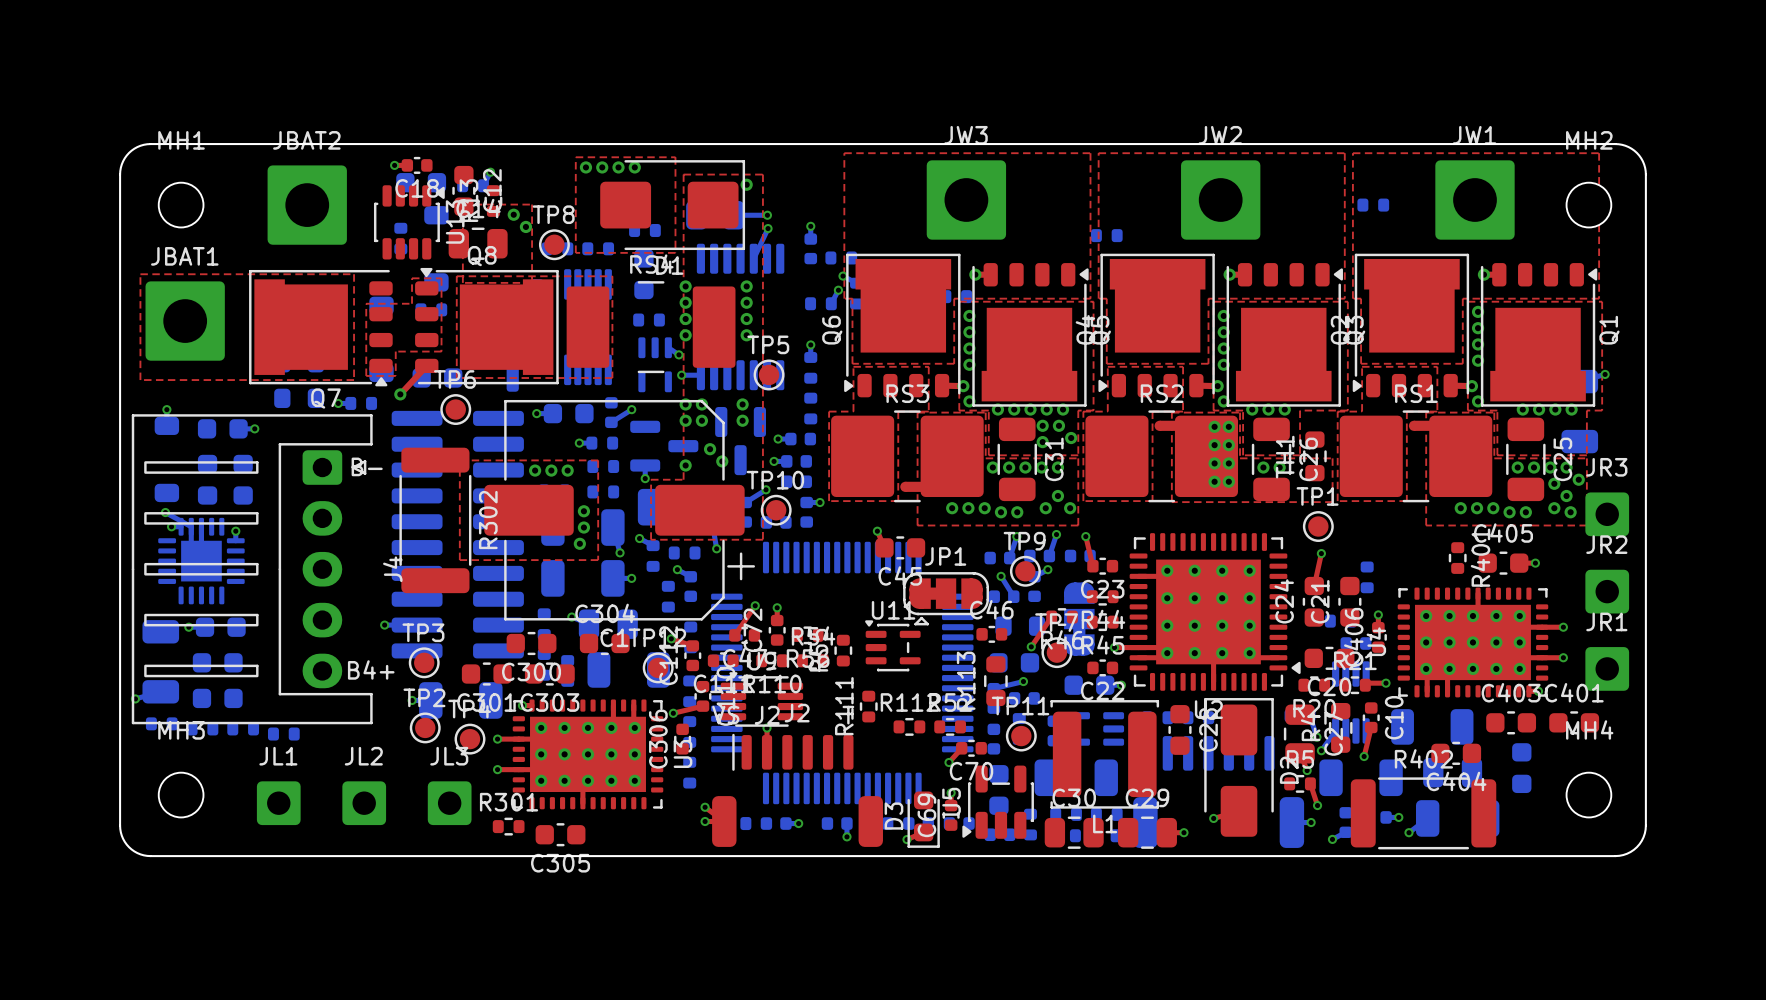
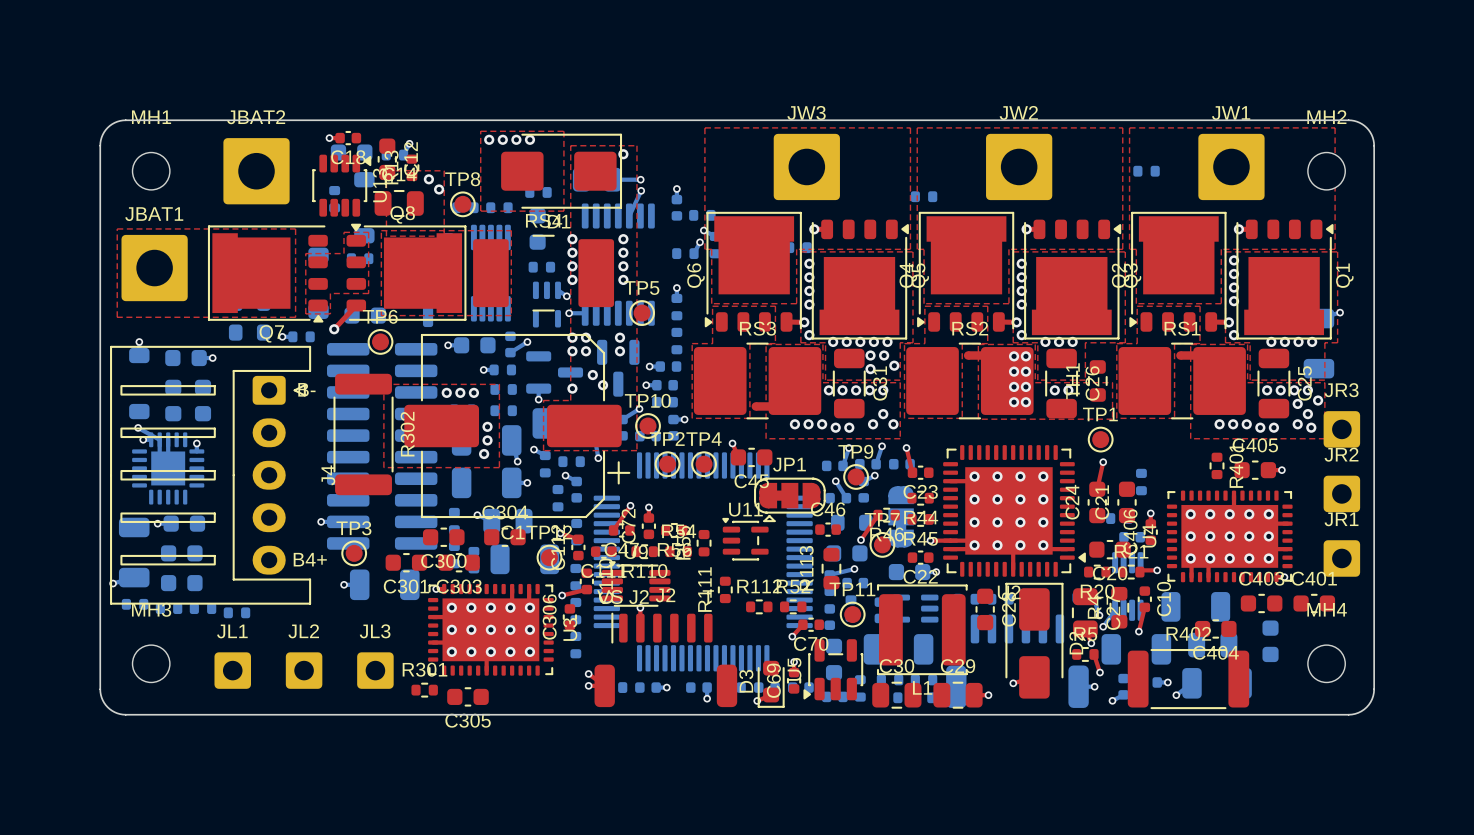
top track: (1542, 627) (1563, 627) -> none
via: (1563, 627) -> none
top track: (1542, 657) (1563, 657) -> none
via: (1563, 657) -> none
TP2 position: (425, 727) -> (667, 464)
TP4 position: (470, 739) -> (704, 464)
top track: (497, 739) (518, 739) -> none
via: (497, 739) -> none
top track: (497, 769) (518, 769) -> none
via: (497, 769) -> none

